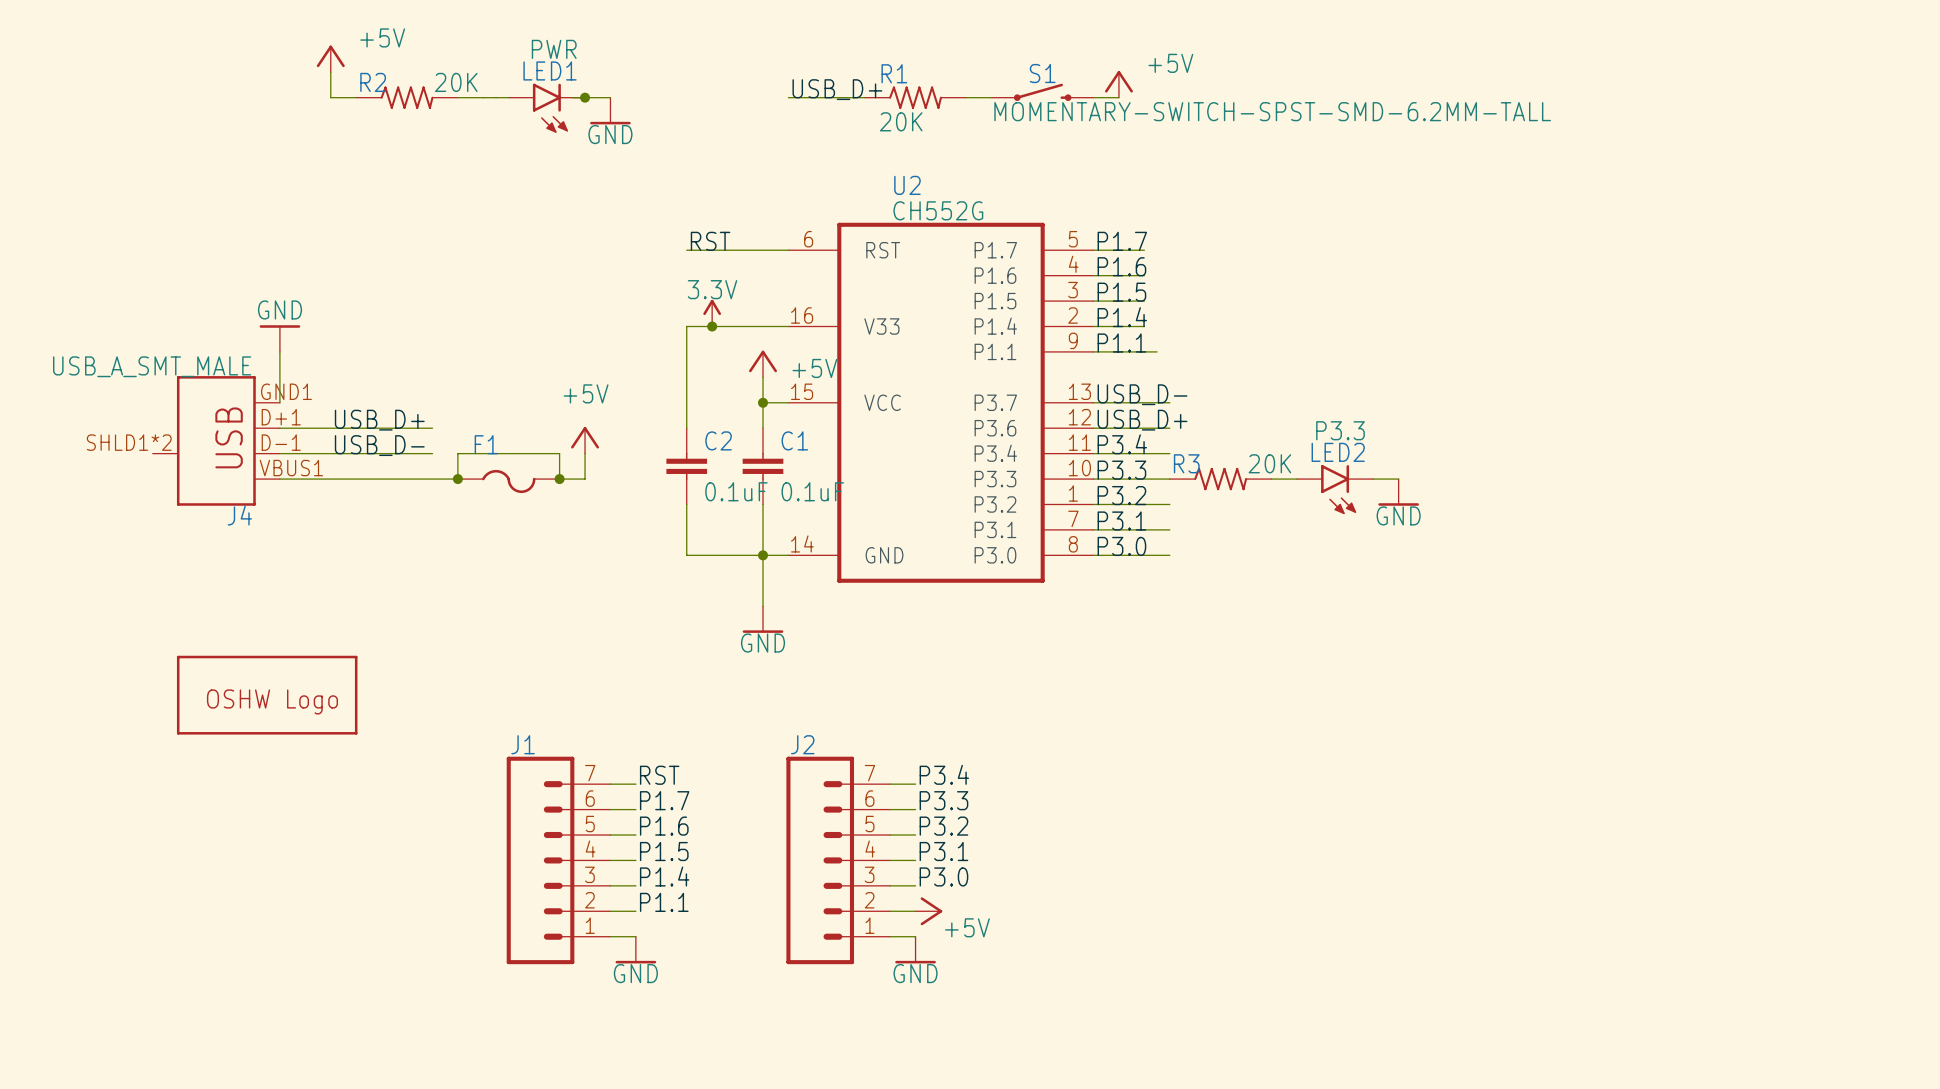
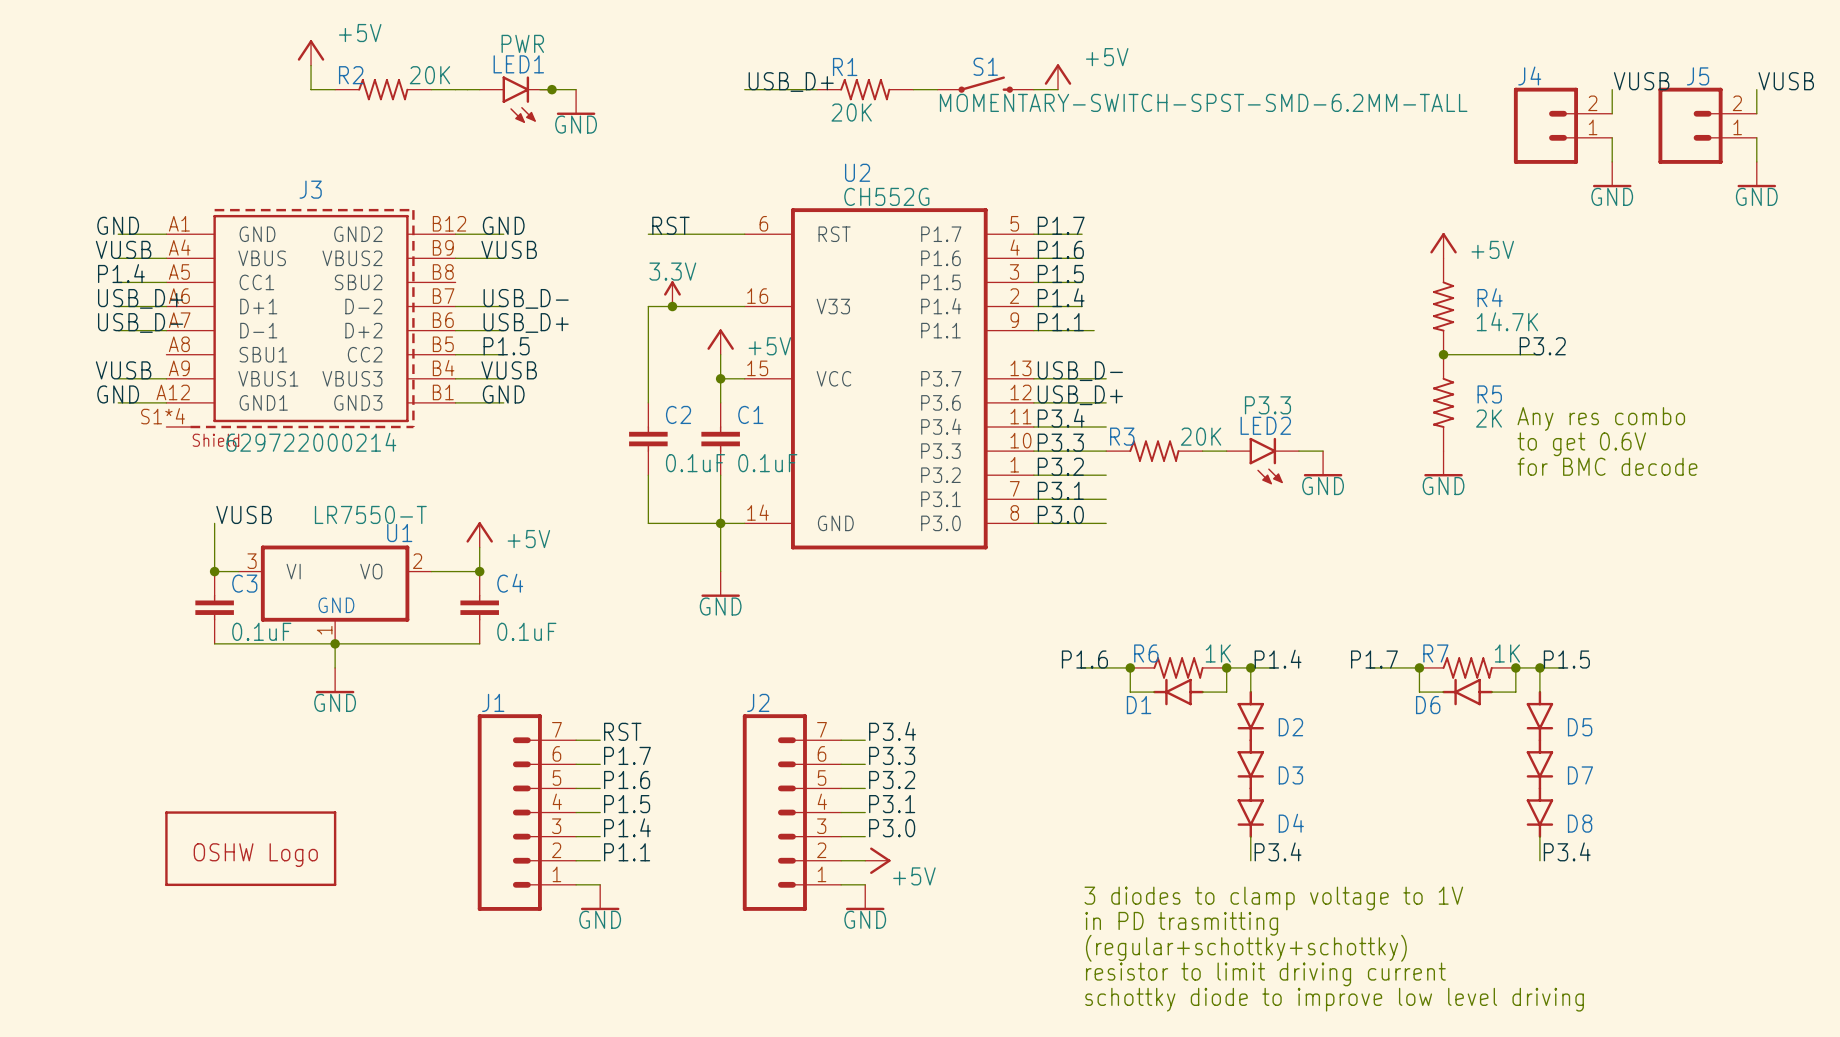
label: none -> VUSB (1641, 81)
label: none -> VUSB (1786, 81)
wire: none -> (1612, 89) (1612, 113)
wire: none -> (1756, 89) (1756, 113)
J5: none -> (1707, 125)
wire: none -> (1612, 137) (1612, 161)
wire: none -> (1756, 137) (1756, 161)
power symbol: none -> GND (1612, 174)
power symbol: none -> GND (1756, 174)
label: none -> GND (118, 225)
label: none -> GND (503, 225)
wire: none -> (118, 234) (166, 234)
wire: none -> (455, 234) (503, 234)
power symbol: none -> +5V (1443, 245)
label: none -> VUSB (123, 249)
label: none -> VUSB (509, 249)
wire: none -> (118, 258) (166, 258)
wire: none -> (455, 258) (503, 258)
label: none -> P1.4 (121, 273)
wire: none -> (118, 282) (166, 282)
label: none -> USB_D+ (140, 298)
label: none -> USB_D- (526, 298)
wire: none -> (118, 306) (166, 306)
wire: none -> (455, 306) (503, 306)
R4: none -> 14.7K (1443, 306)
power symbol: GND (279, 338) -> none
J3: none -> 629722000214 (311, 318)
label: none -> USB_D- (140, 322)
label: none -> USB_D+ (526, 322)
wire: none -> (118, 330) (166, 330)
wire: (279, 351) (279, 402) -> none
wire: none -> (455, 330) (503, 330)
J4 value: USB_A_SMT_MALE (152, 366) -> none
label: none -> P1.5 (506, 346)
label: none -> P3.2 (1542, 346)
J4 symbol: [152, 376, 280, 506] -> [1513, 87, 1613, 164]
wire: none -> (455, 354) (503, 354)
wire: none -> (1443, 354) (1539, 354)
junction: none -> (1443, 354)
label: none -> VUSB (123, 370)
label: none -> VUSB (509, 370)
power symbol text position: +5V (586, 393) -> +5V (528, 539)
wire: none -> (118, 378) (166, 378)
wire: none -> (455, 378) (503, 378)
label: none -> GND (118, 394)
label: none -> GND (503, 394)
label: USB_D+ (379, 420) -> none
wire: none -> (118, 402) (166, 402)
wire: (279, 428) (432, 428) -> none
wire: none -> (455, 402) (503, 402)
R5: none -> 2K (1443, 402)
power symbol position: +5V (585, 440) -> +5V (479, 534)
label: USB_D- (379, 445) -> none
text: none -> Any res combo (1601, 418)
wire: (585, 453) (585, 479) (559, 479) (559, 453) (457, 453) (457, 479) (279, 479) -> none
text: none -> to get 0.6V (1581, 444)
junction: (457, 479) -> none
junction: (559, 479) -> none
F1: (508, 481) -> none
power symbol: none -> GND (1443, 463)
text: none -> for BMC decode (1607, 466)
J4 name position: J4 (239, 515) -> J4 (1529, 75)
label: none -> VUSB (244, 514)
wire: none -> (214, 523) (214, 571) (238, 571)
wire: none -> (479, 547) (479, 571) (431, 571)
junction: none -> (214, 571)
junction: none -> (479, 571)
U1: none -> (335, 594)
C3: none -> 0.1uF (214, 607)
C4: none -> 0.1uF (479, 607)
wire: none -> (214, 643) (479, 643)
junction: none -> (335, 643)
part position: (267, 695) -> (250, 848)
label: none -> P1.6 (1084, 659)
label: none -> P1.4 (1278, 659)
label: none -> P1.7 (1374, 659)
label: none -> P1.5 (1566, 659)
wire: none -> (1082, 667) (1130, 667) (1130, 692) (1154, 692)
junction: none -> (1130, 667)
R6: none -> 1K (1178, 667)
junction: none -> (1226, 667)
wire: none -> (1250, 667) (1250, 692)
junction: none -> (1250, 667)
wire: none -> (1274, 667) (1226, 667) (1226, 692) (1202, 692)
wire: none -> (1371, 667) (1419, 667) (1419, 692) (1443, 692)
junction: none -> (1419, 667)
R7: none -> 1K (1467, 667)
junction: none -> (1515, 667)
wire: none -> (1539, 667) (1539, 692)
junction: none -> (1539, 667)
wire: none -> (1564, 667) (1515, 667) (1515, 692) (1491, 692)
power symbol: none -> GND (335, 680)
D1: none -> (1178, 692)
D6: none -> (1467, 692)
D2: none -> (1250, 716)
D5: none -> (1539, 716)
D3: none -> (1250, 764)
D7: none -> (1539, 764)
D4: none -> (1250, 812)
D8: none -> (1539, 812)
wire: none -> (1250, 836) (1250, 860)
wire: none -> (1539, 836) (1539, 860)
label: none -> P3.4 (1278, 851)
label: none -> P3.4 (1567, 851)
text: none -> 3 diodes to clamp voltage to 1V (1273, 898)
text: none -> in PD trasmitting (1181, 923)
text: none -> (regular+schottky+schottky) (1246, 948)
text: none -> resistor to limit driving current (1265, 974)
text: none -> schottky diode to improve low level driving (1334, 999)

